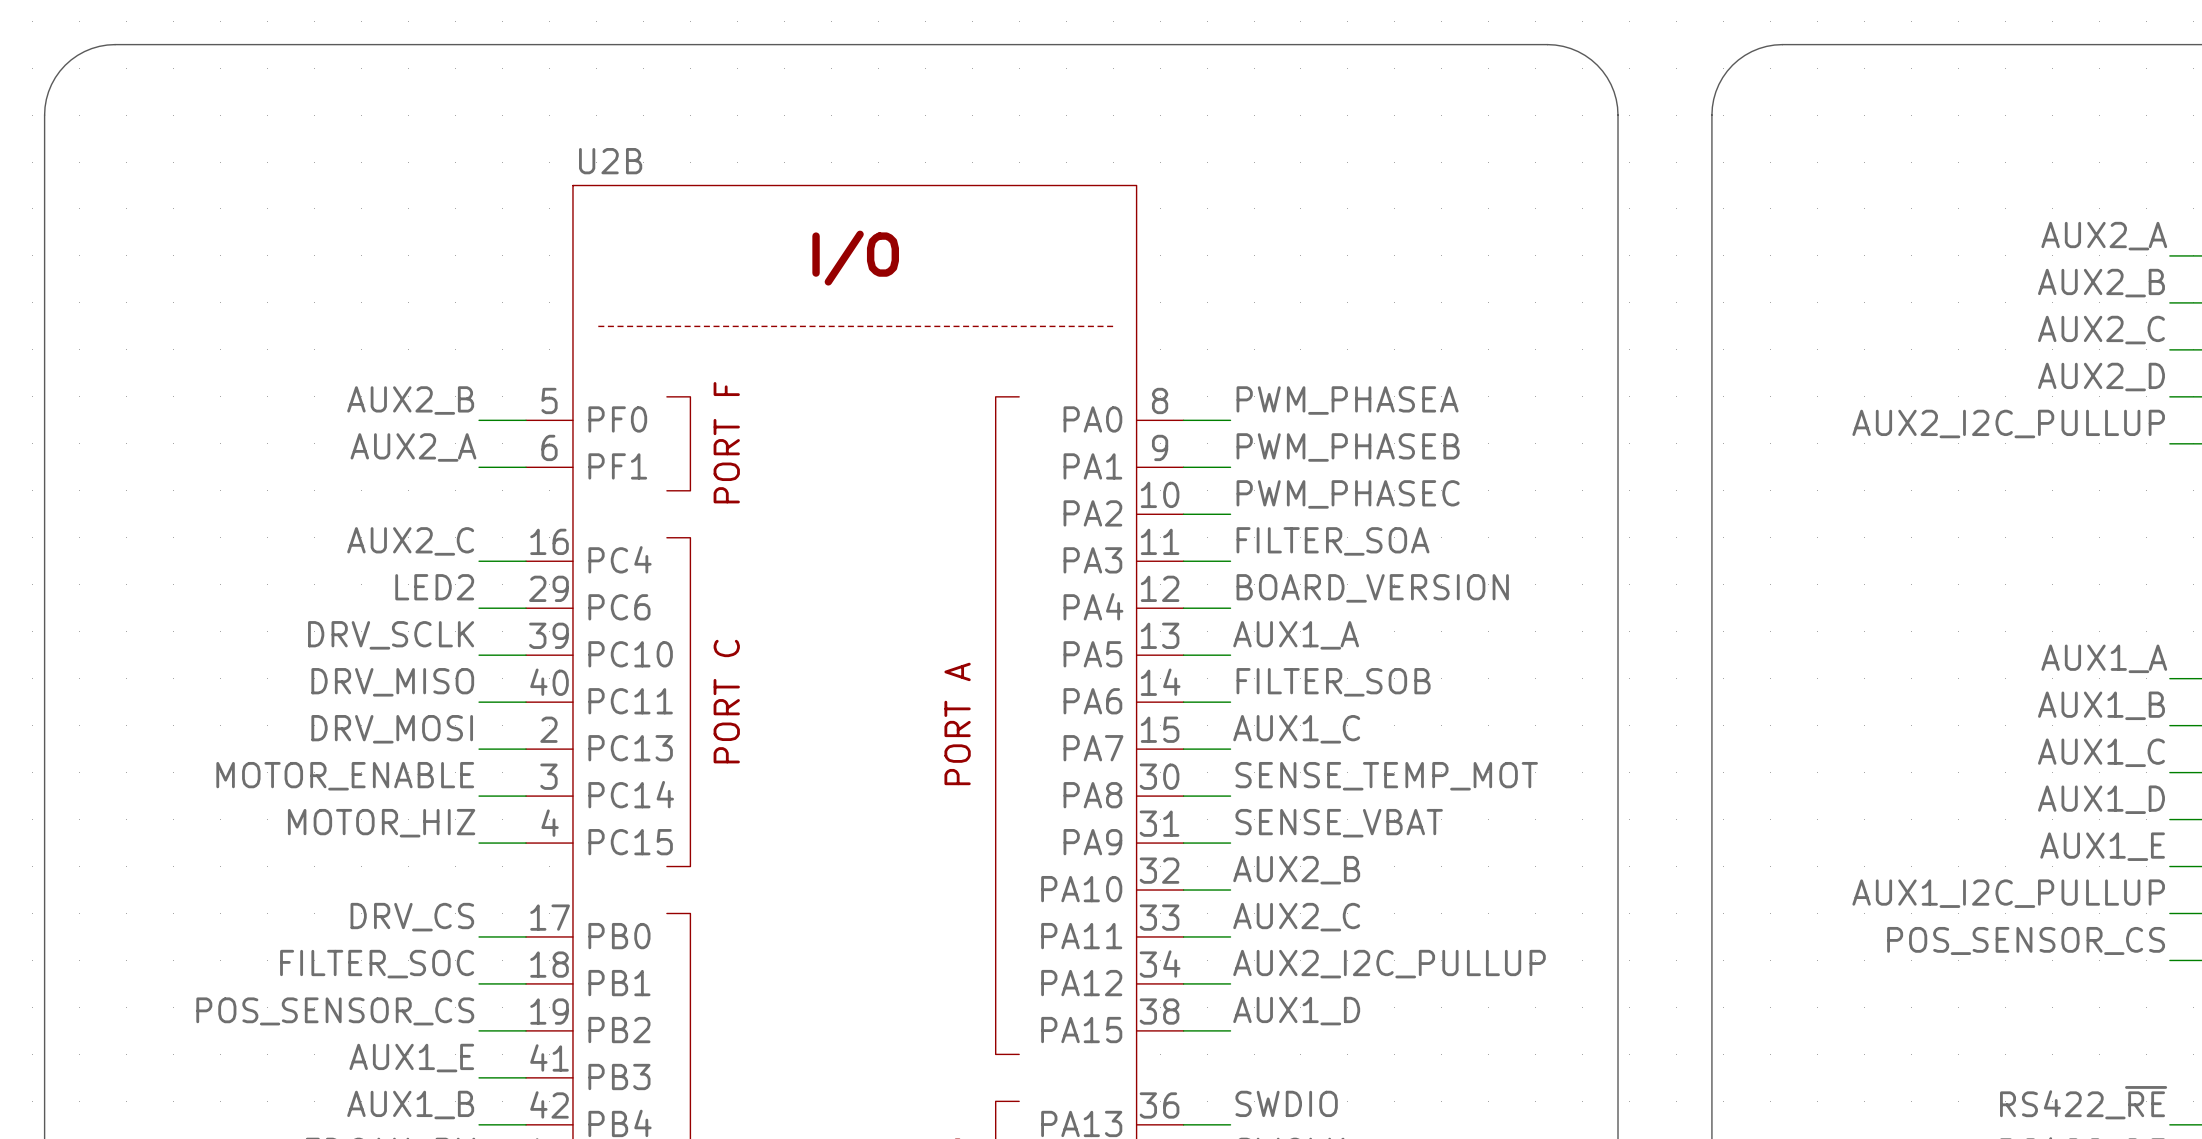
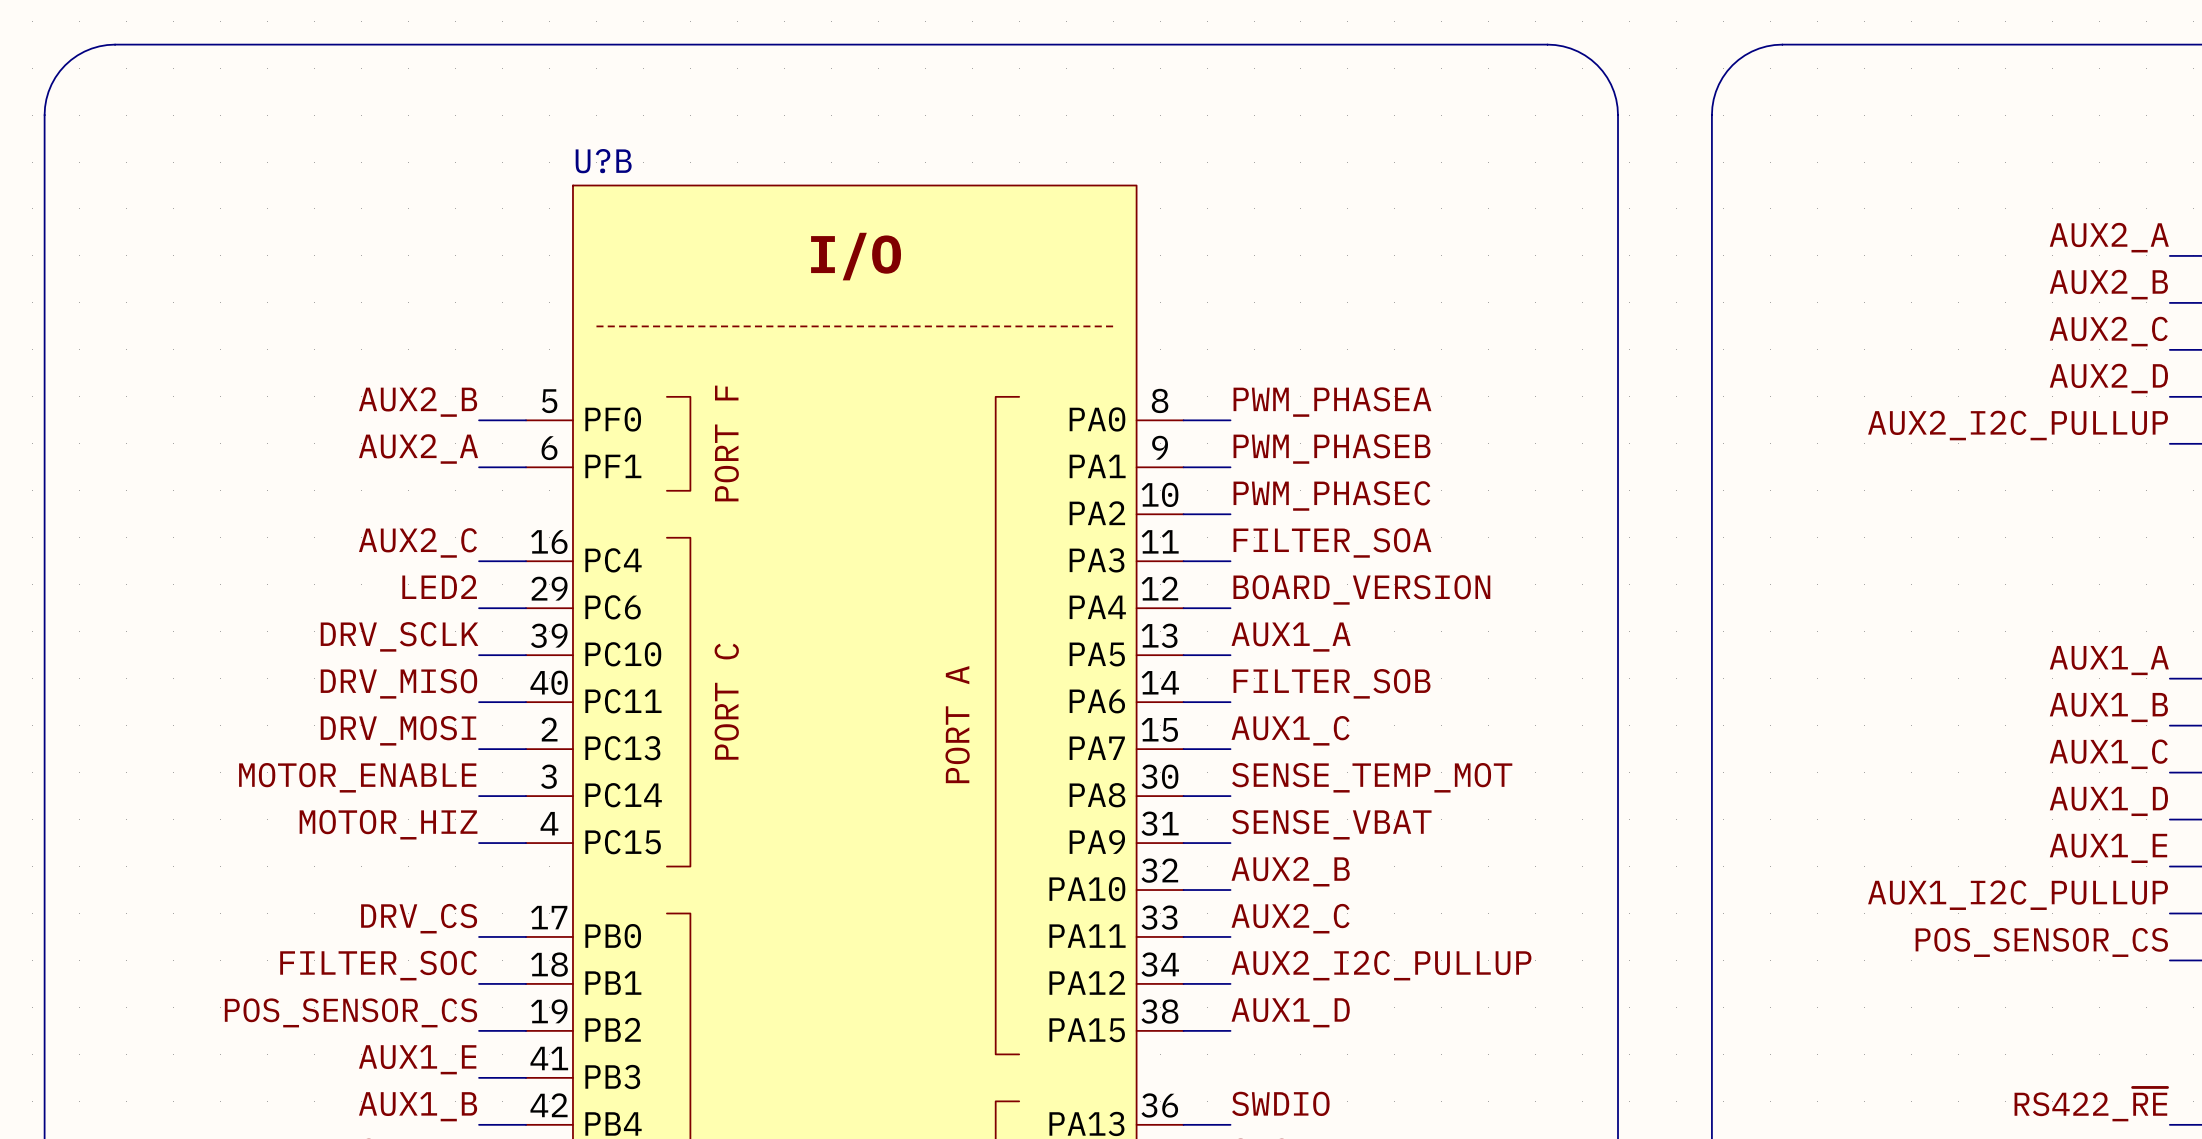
U2B name: U2B (610, 161) -> U?B (603, 161)

